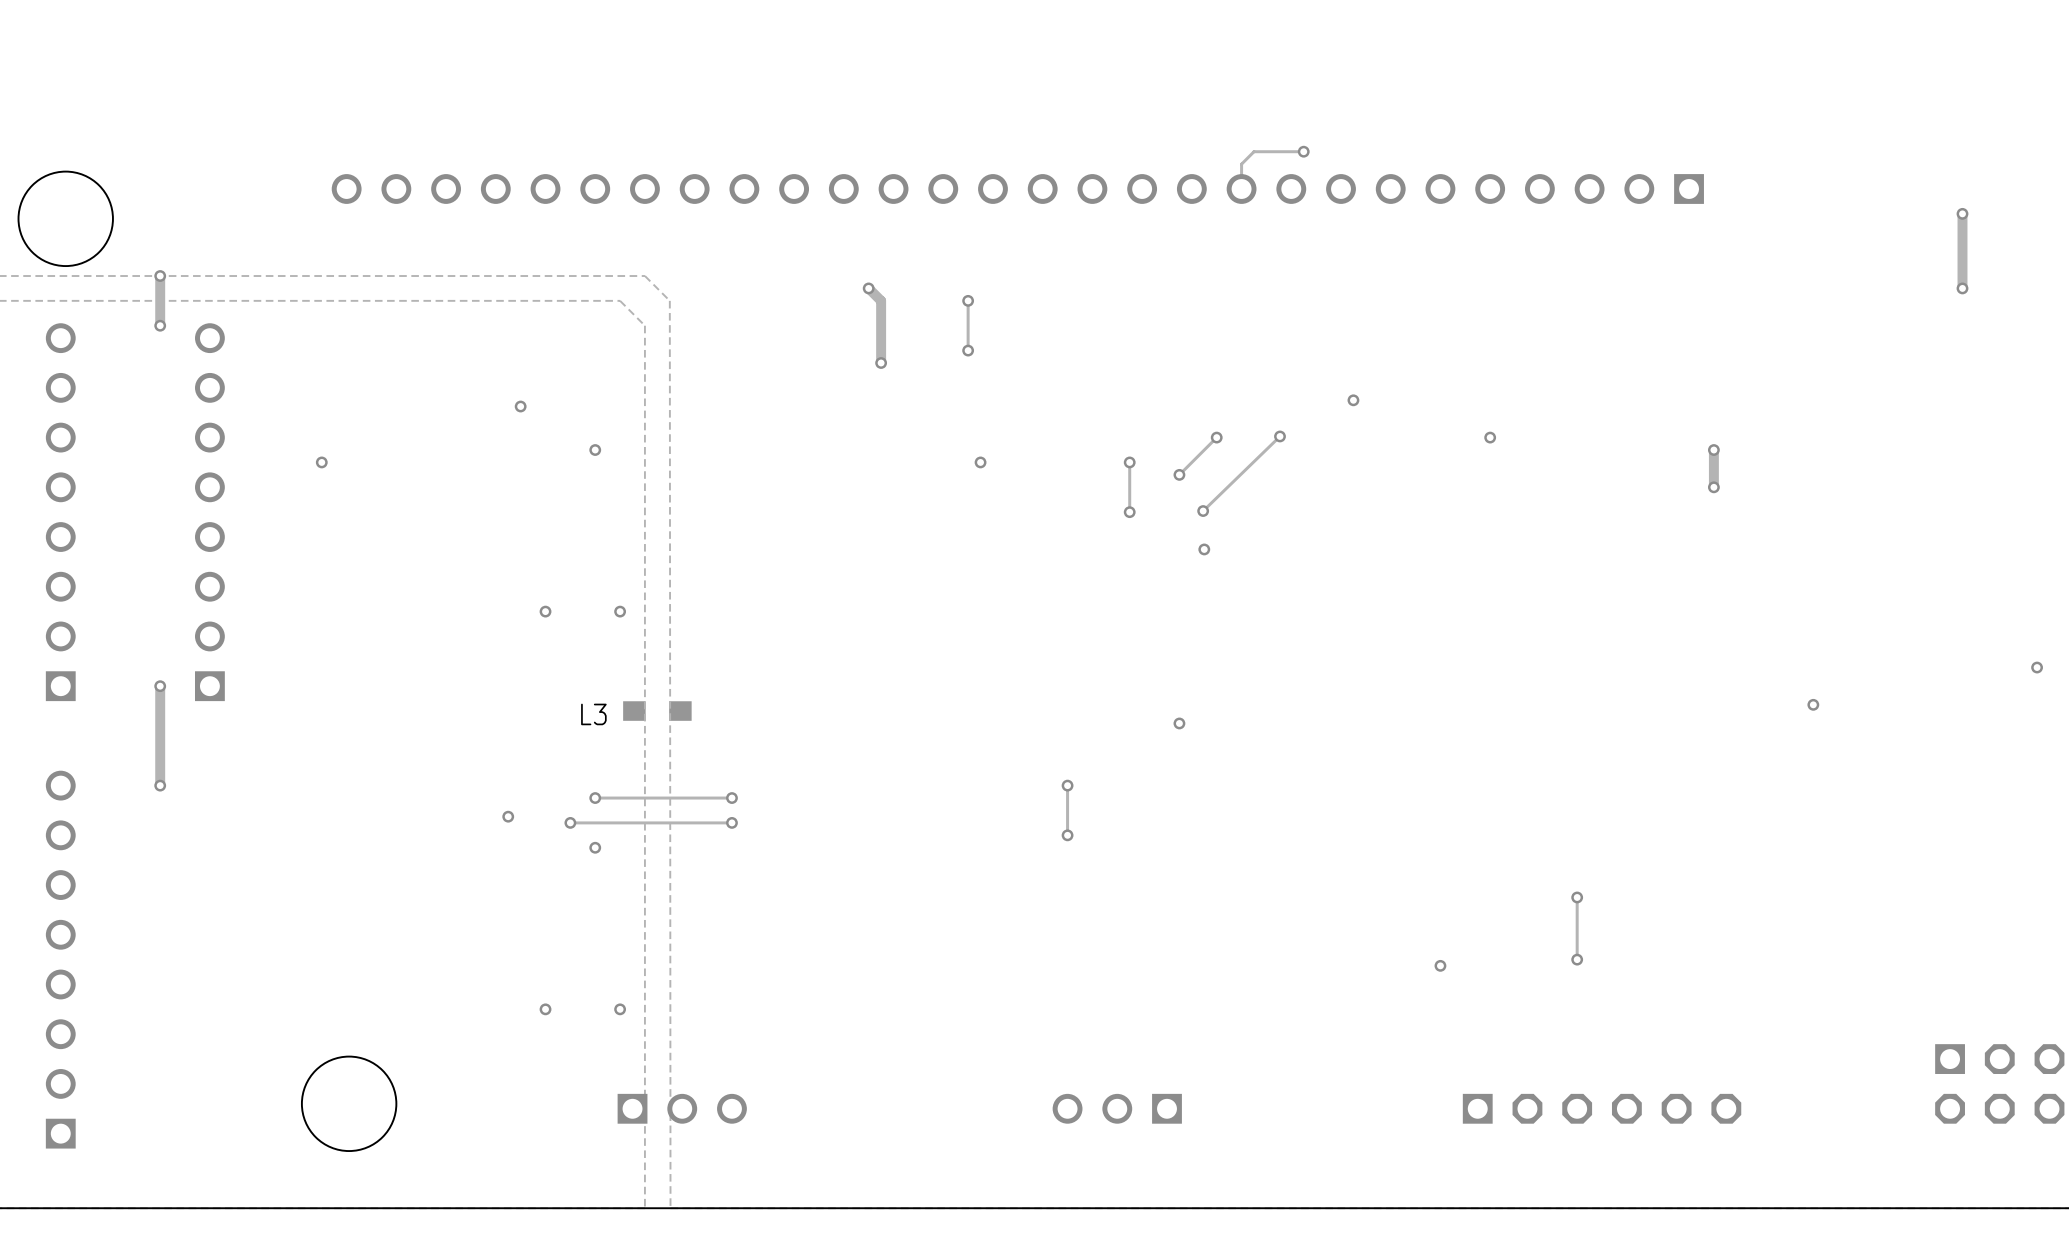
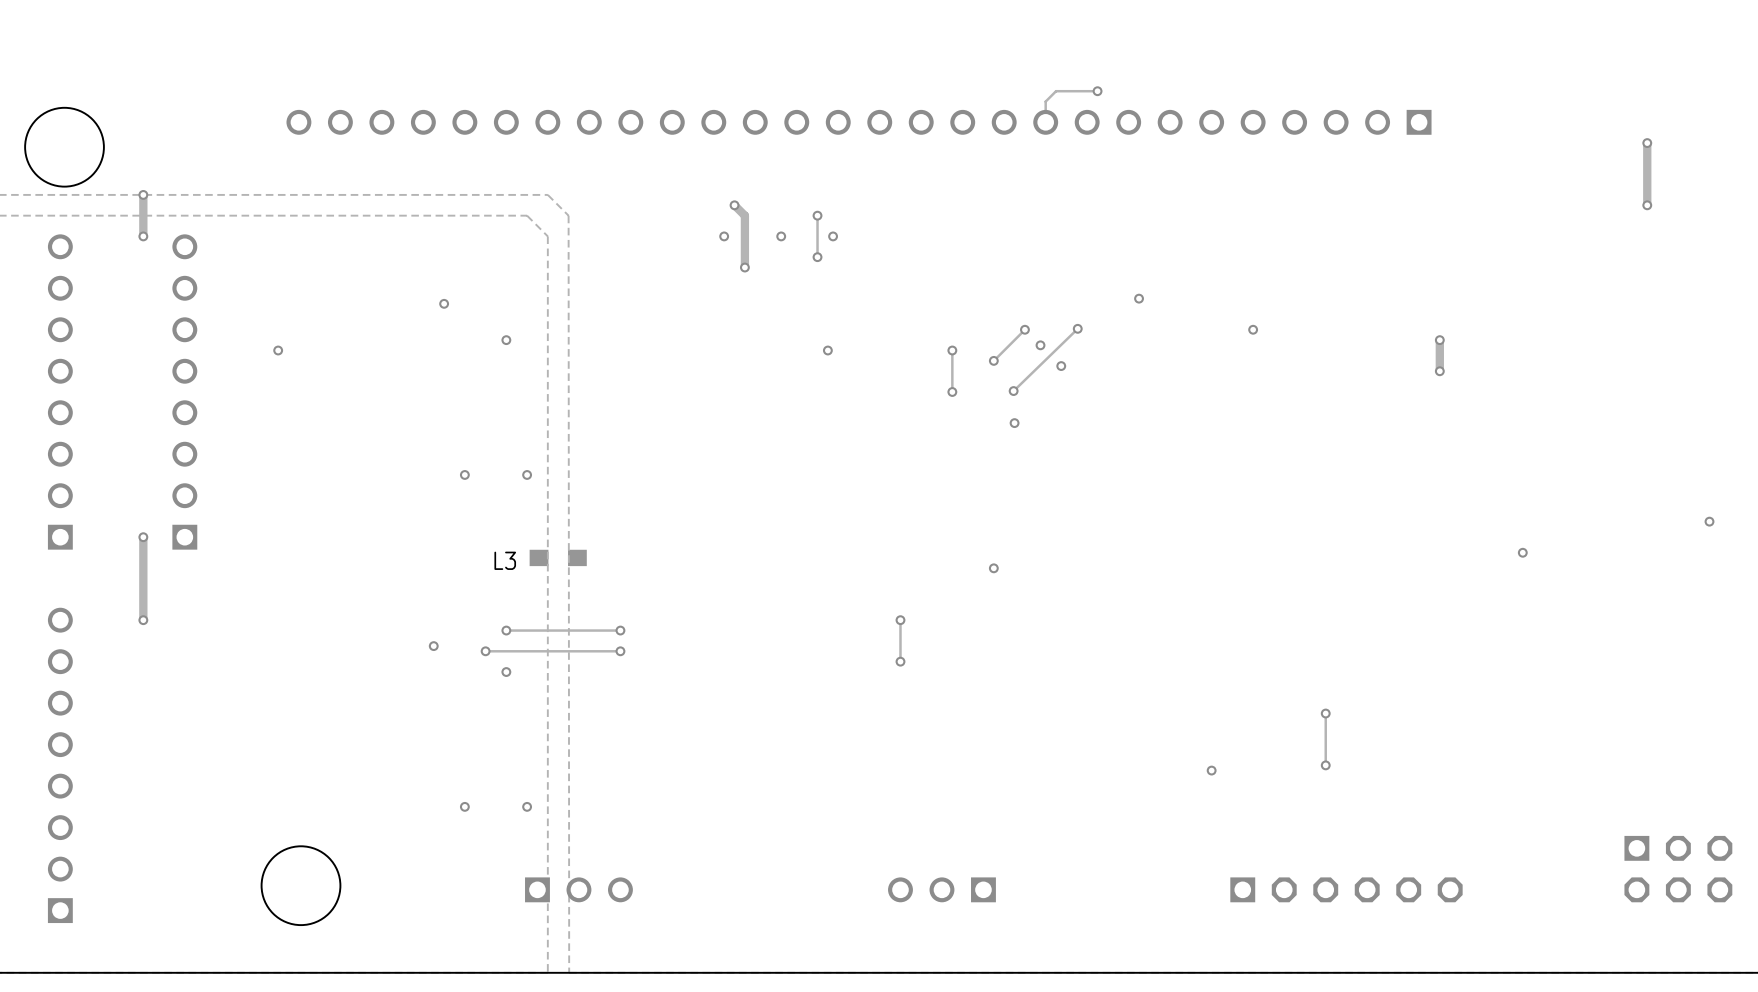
via: none -> (724, 236)
via: none -> (781, 236)
via: none -> (833, 236)
via: none -> (1040, 345)
via: none -> (1061, 366)

